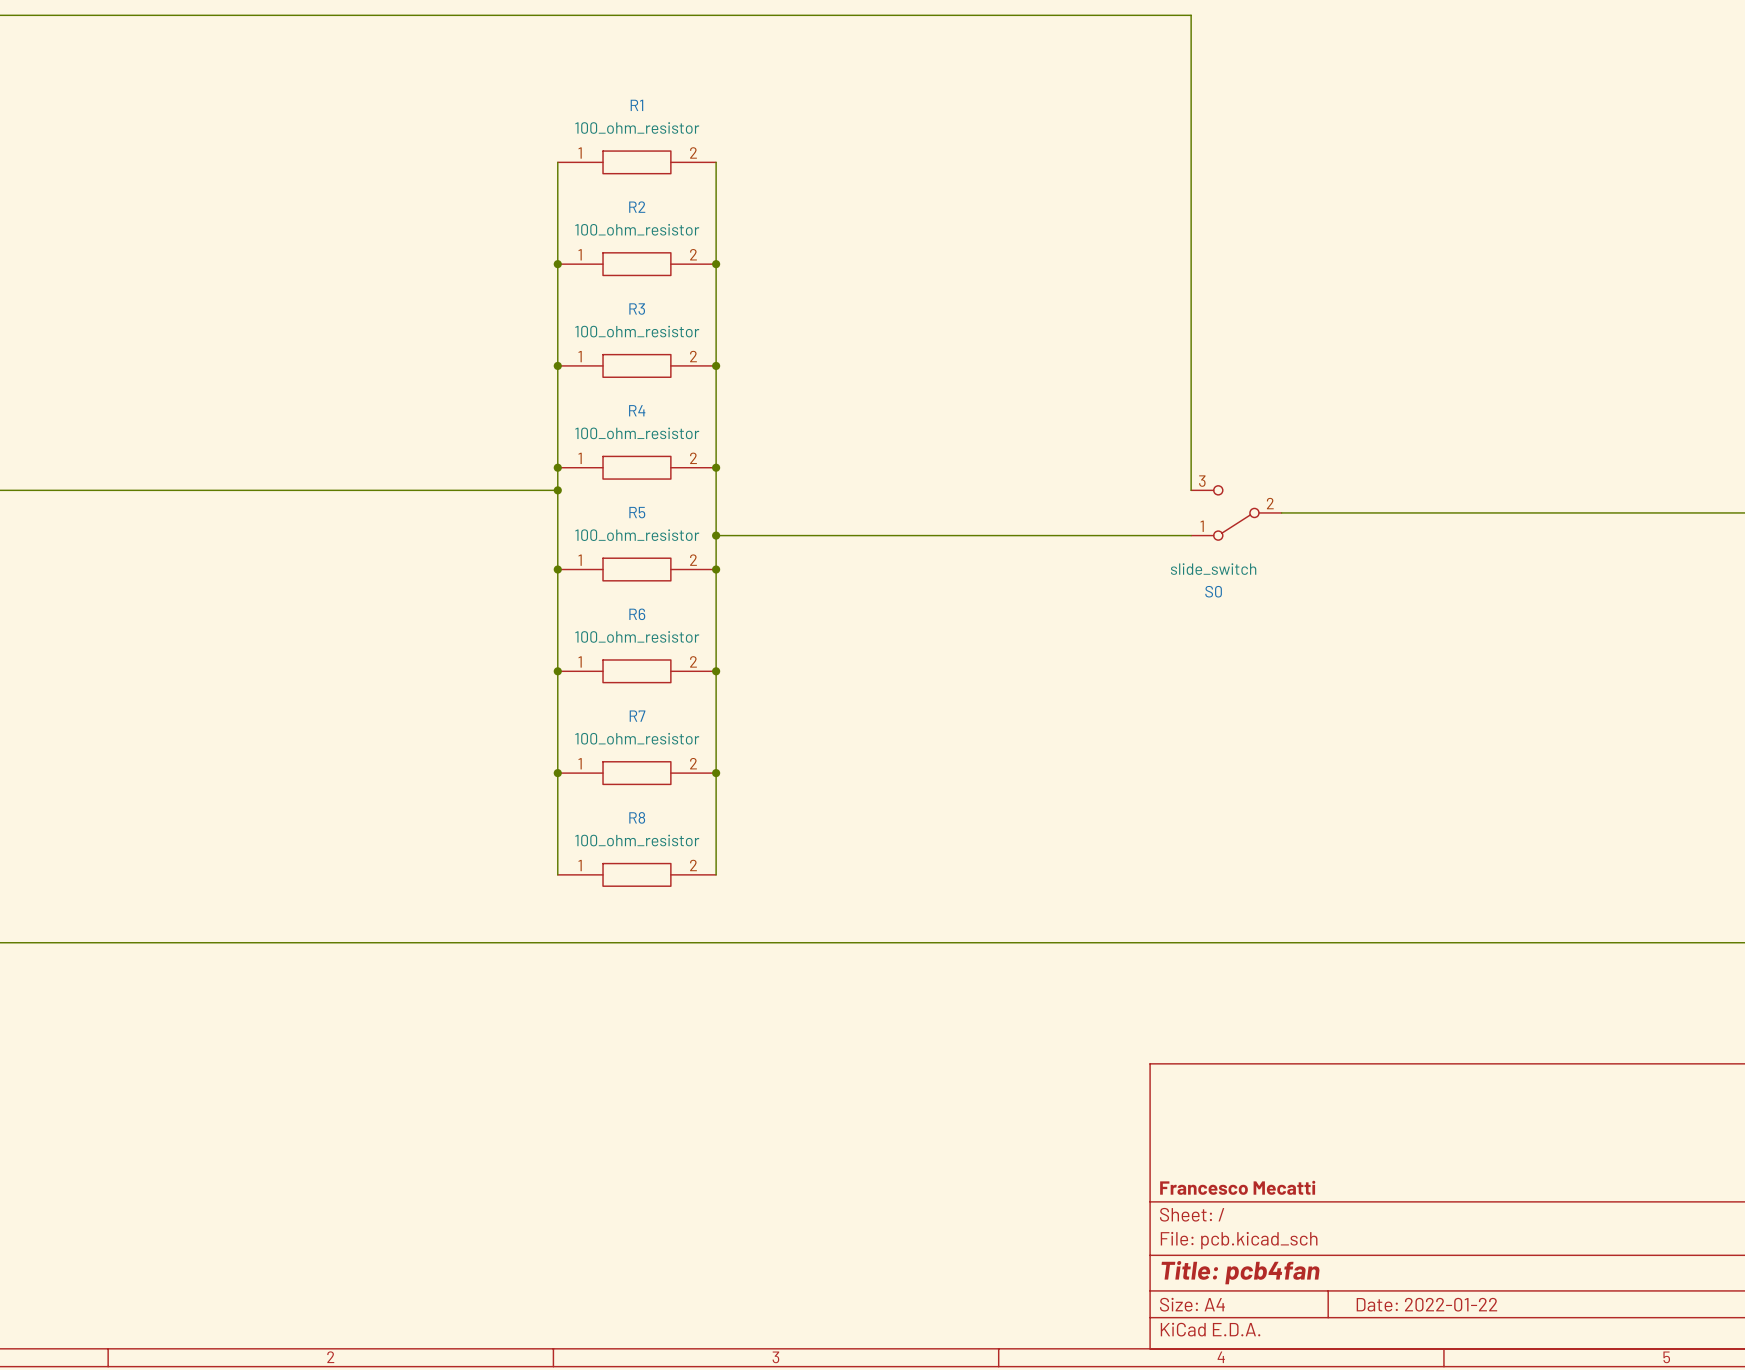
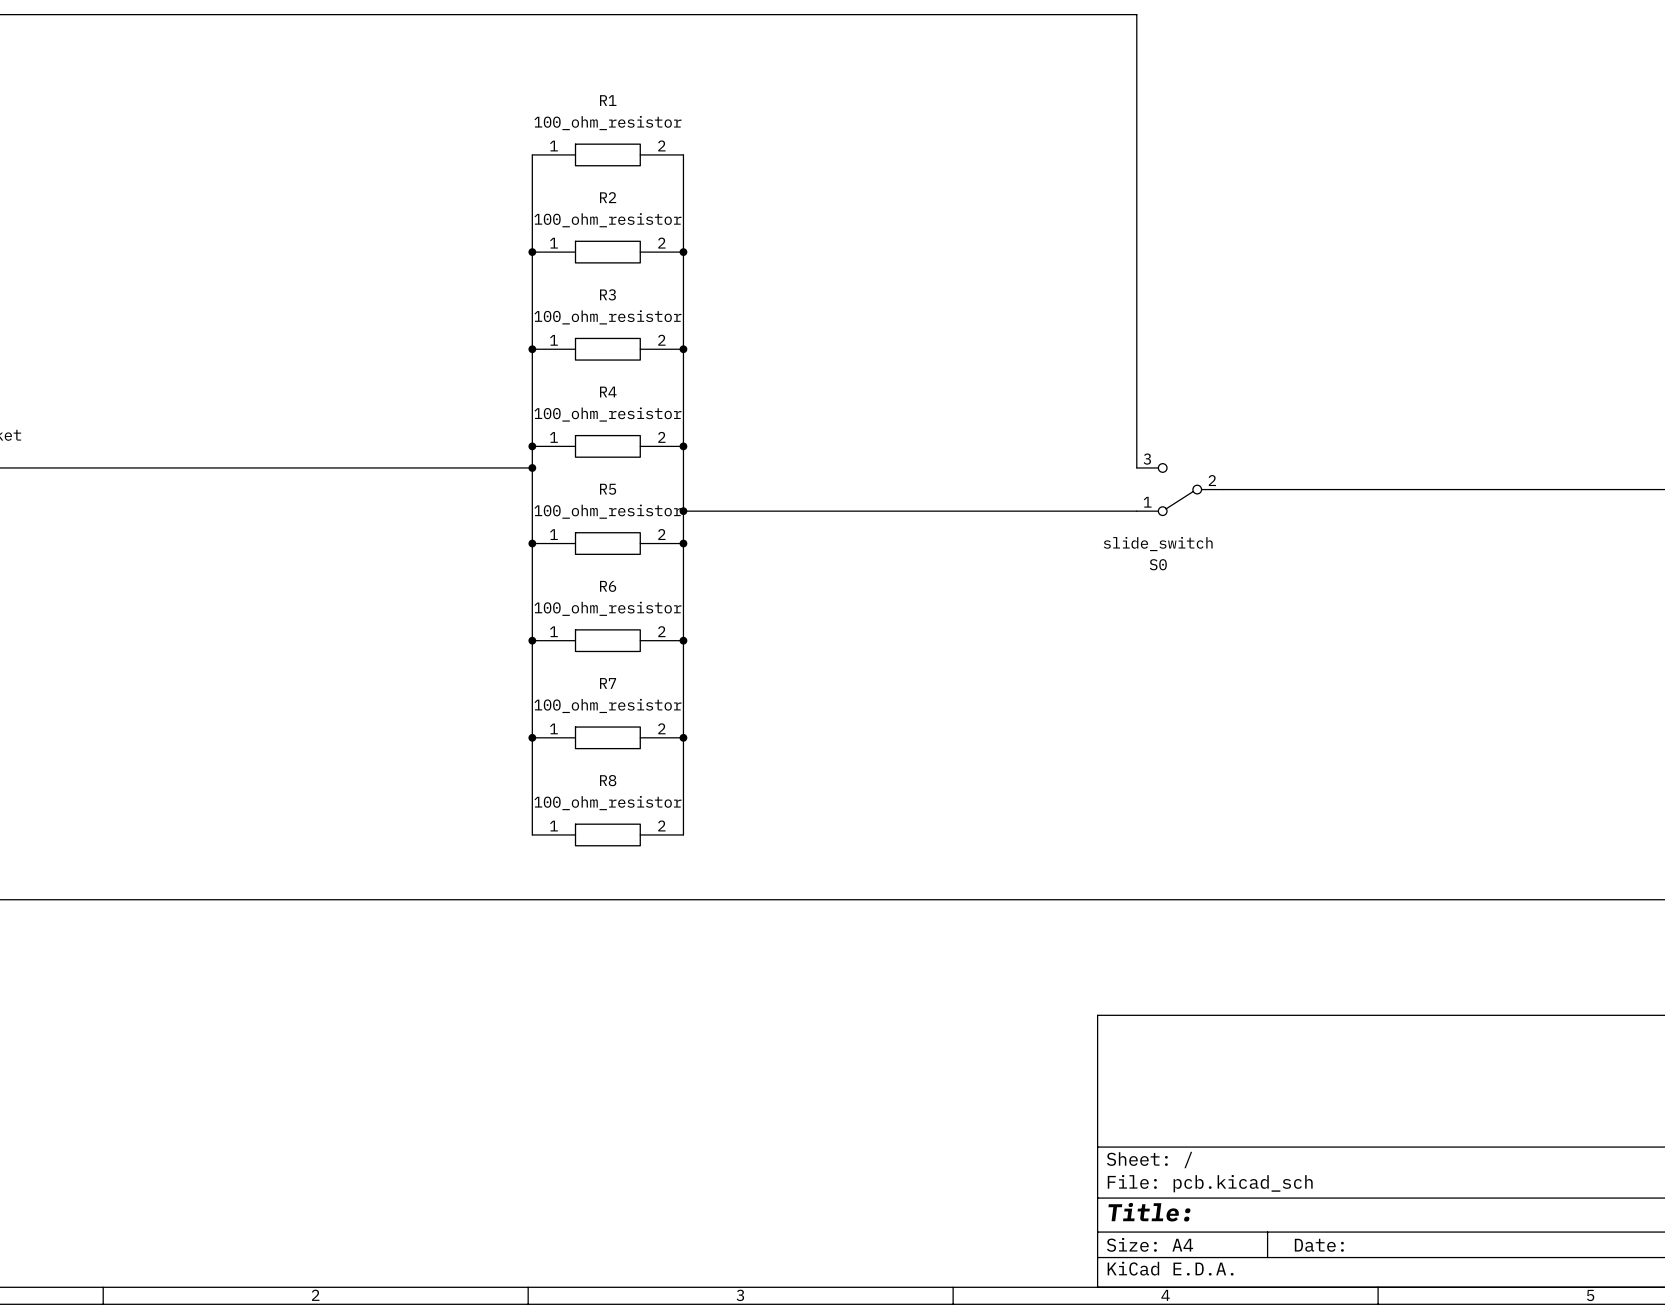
title block: Francesco Mecatti (1237, 1187) -> none
title block: Title: pcb4fan (1240, 1272) -> Title: (1149, 1212)
title block: Date: 2022-01-22 (1426, 1304) -> Date: (1319, 1245)

